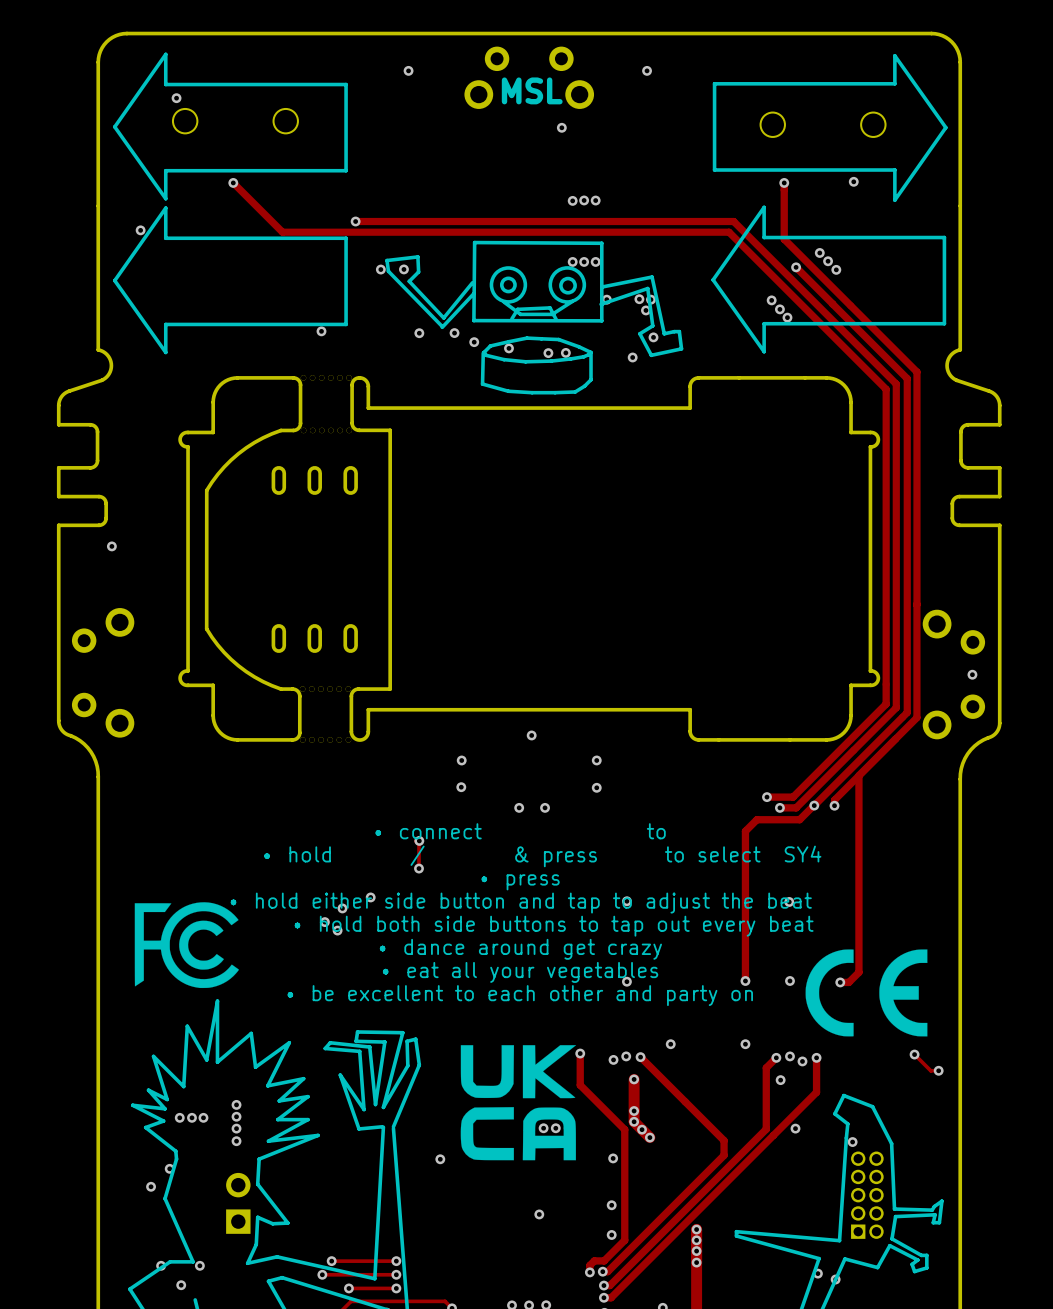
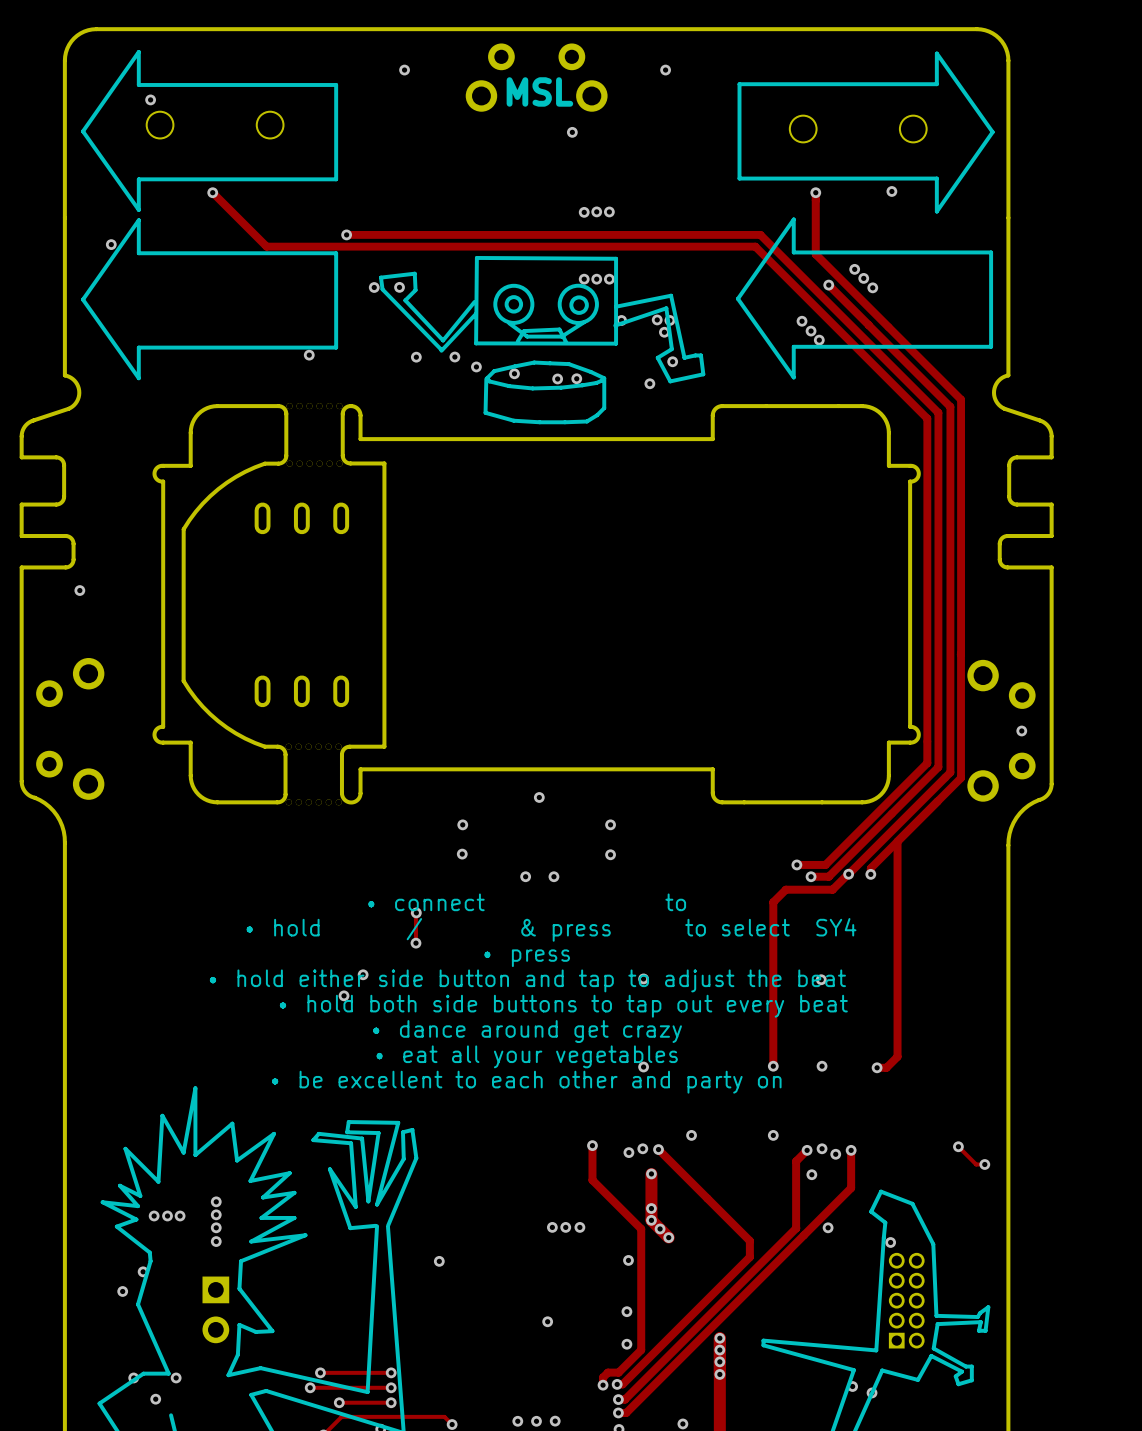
drawing: [134, 902, 239, 989] -> none
via: (342, 908) -> none
via: none -> (344, 995)
via: (324, 922) -> none
via: (337, 930) -> none
drawing: [805, 949, 928, 1037] -> none
drawing: [460, 1045, 577, 1161] -> none
part rotation: 0° (238, 1203) -> 180° (215, 1309)

